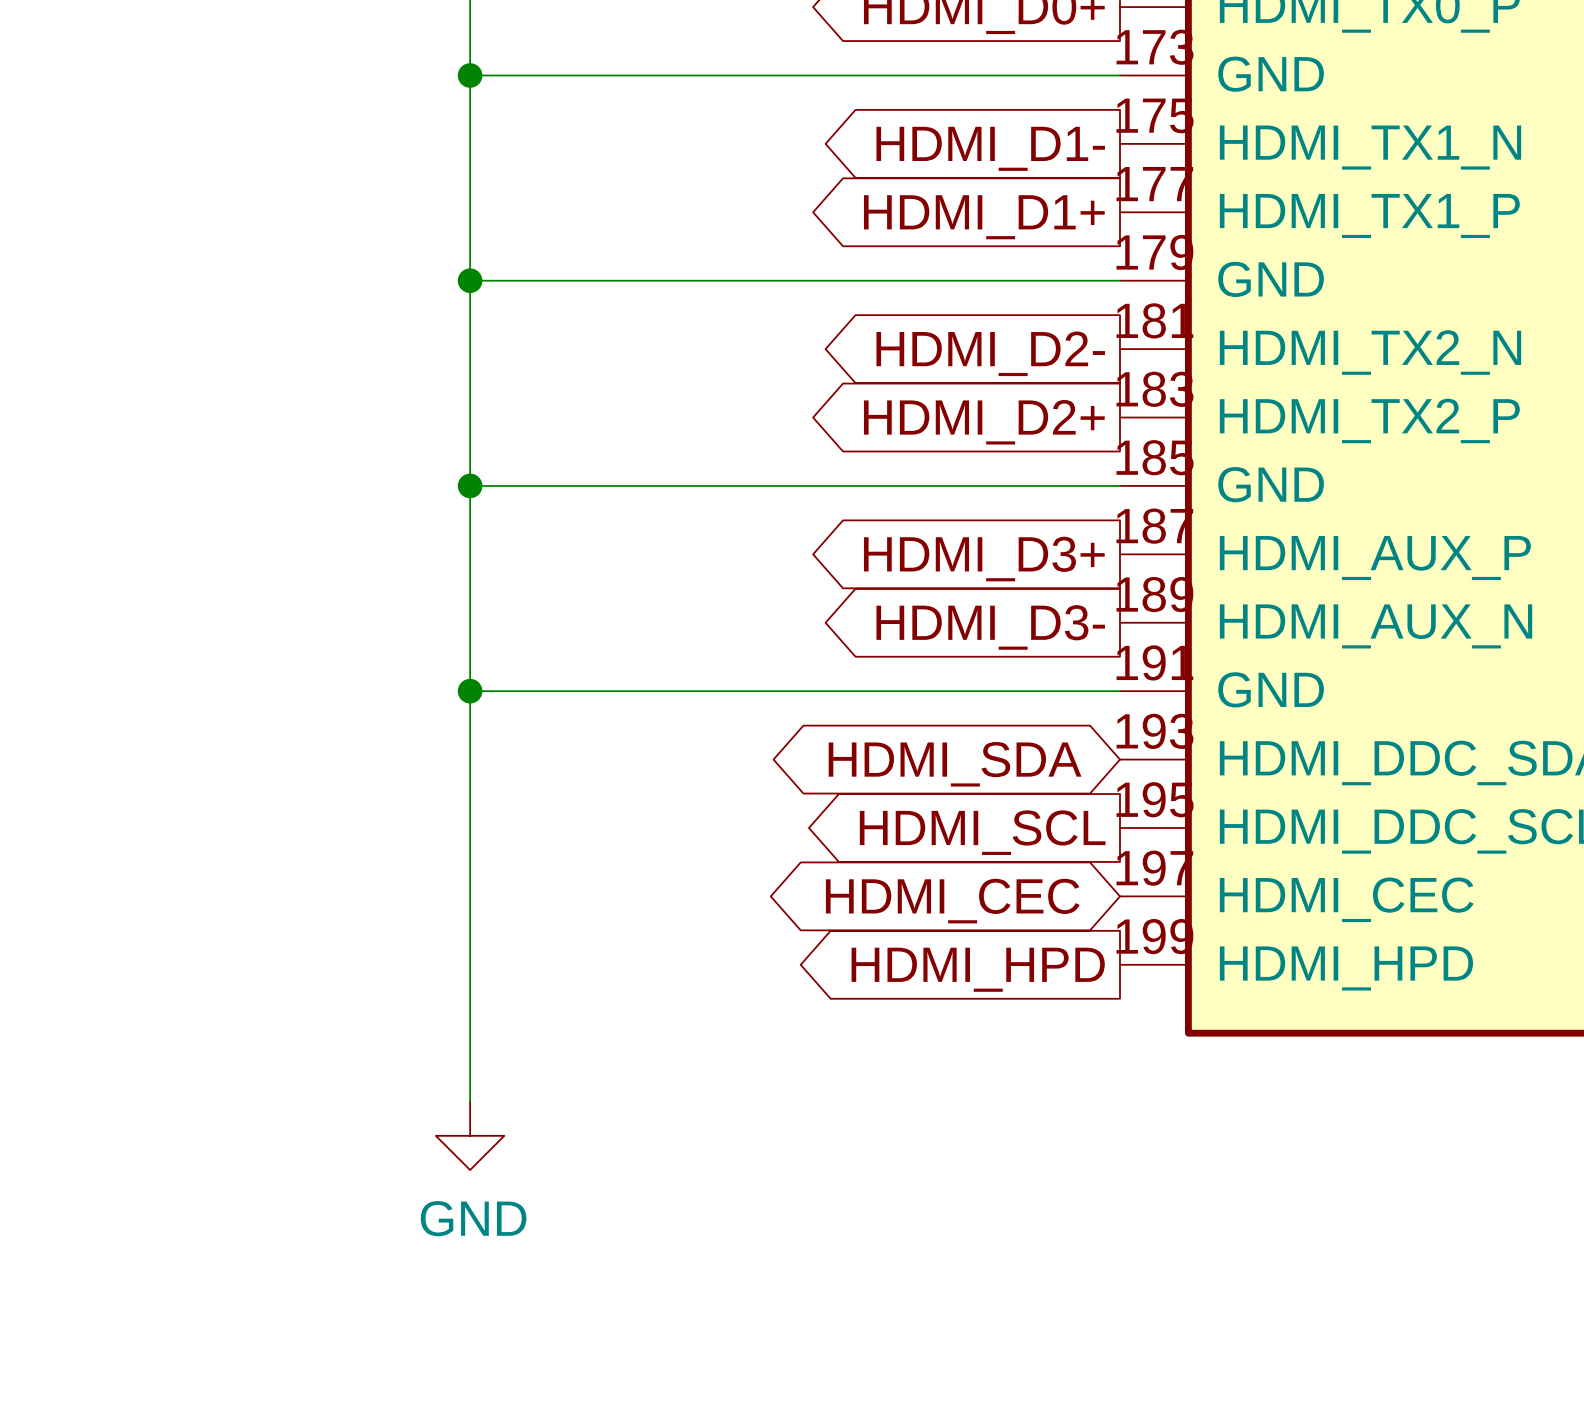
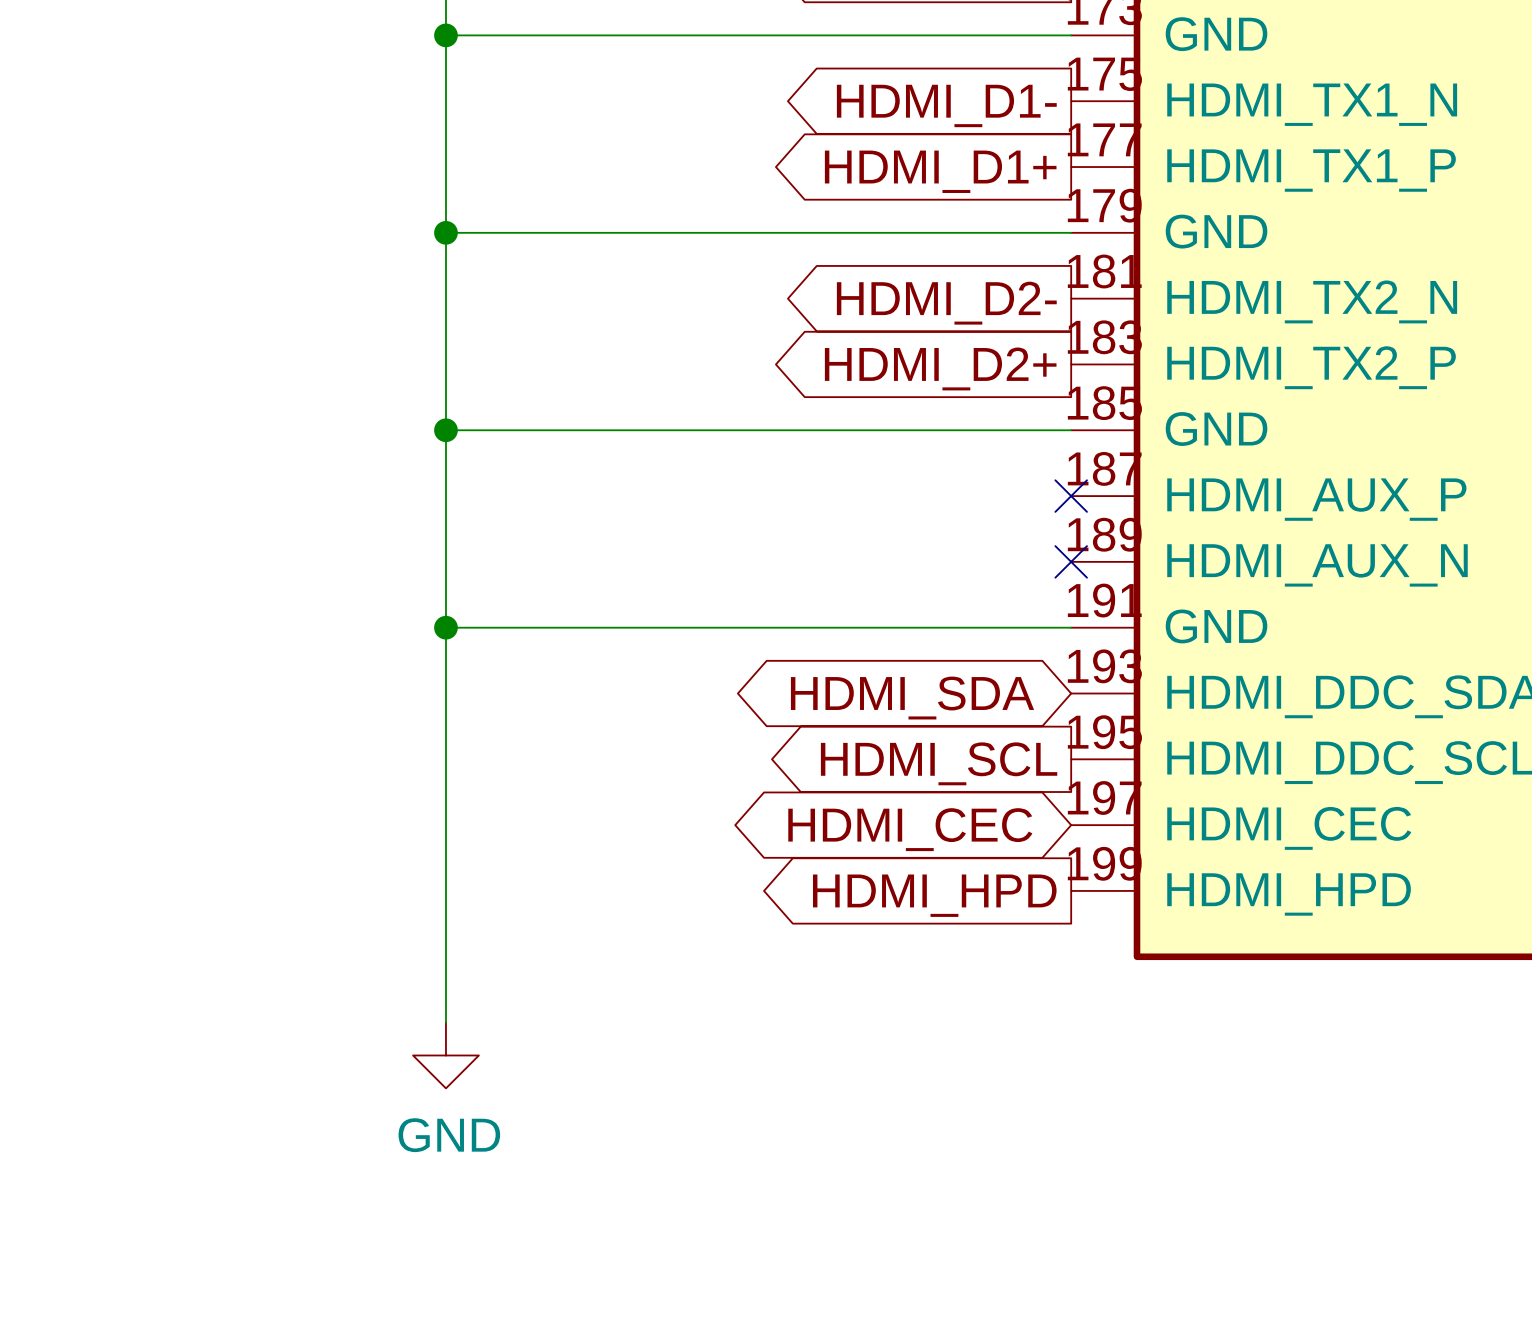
no-connect mark: none -> (1071, 496)
global label: HDMI_D3+ (984, 559) -> none
no-connect mark: none -> (1071, 561)
global label: HDMI_D3- (990, 627) -> none

